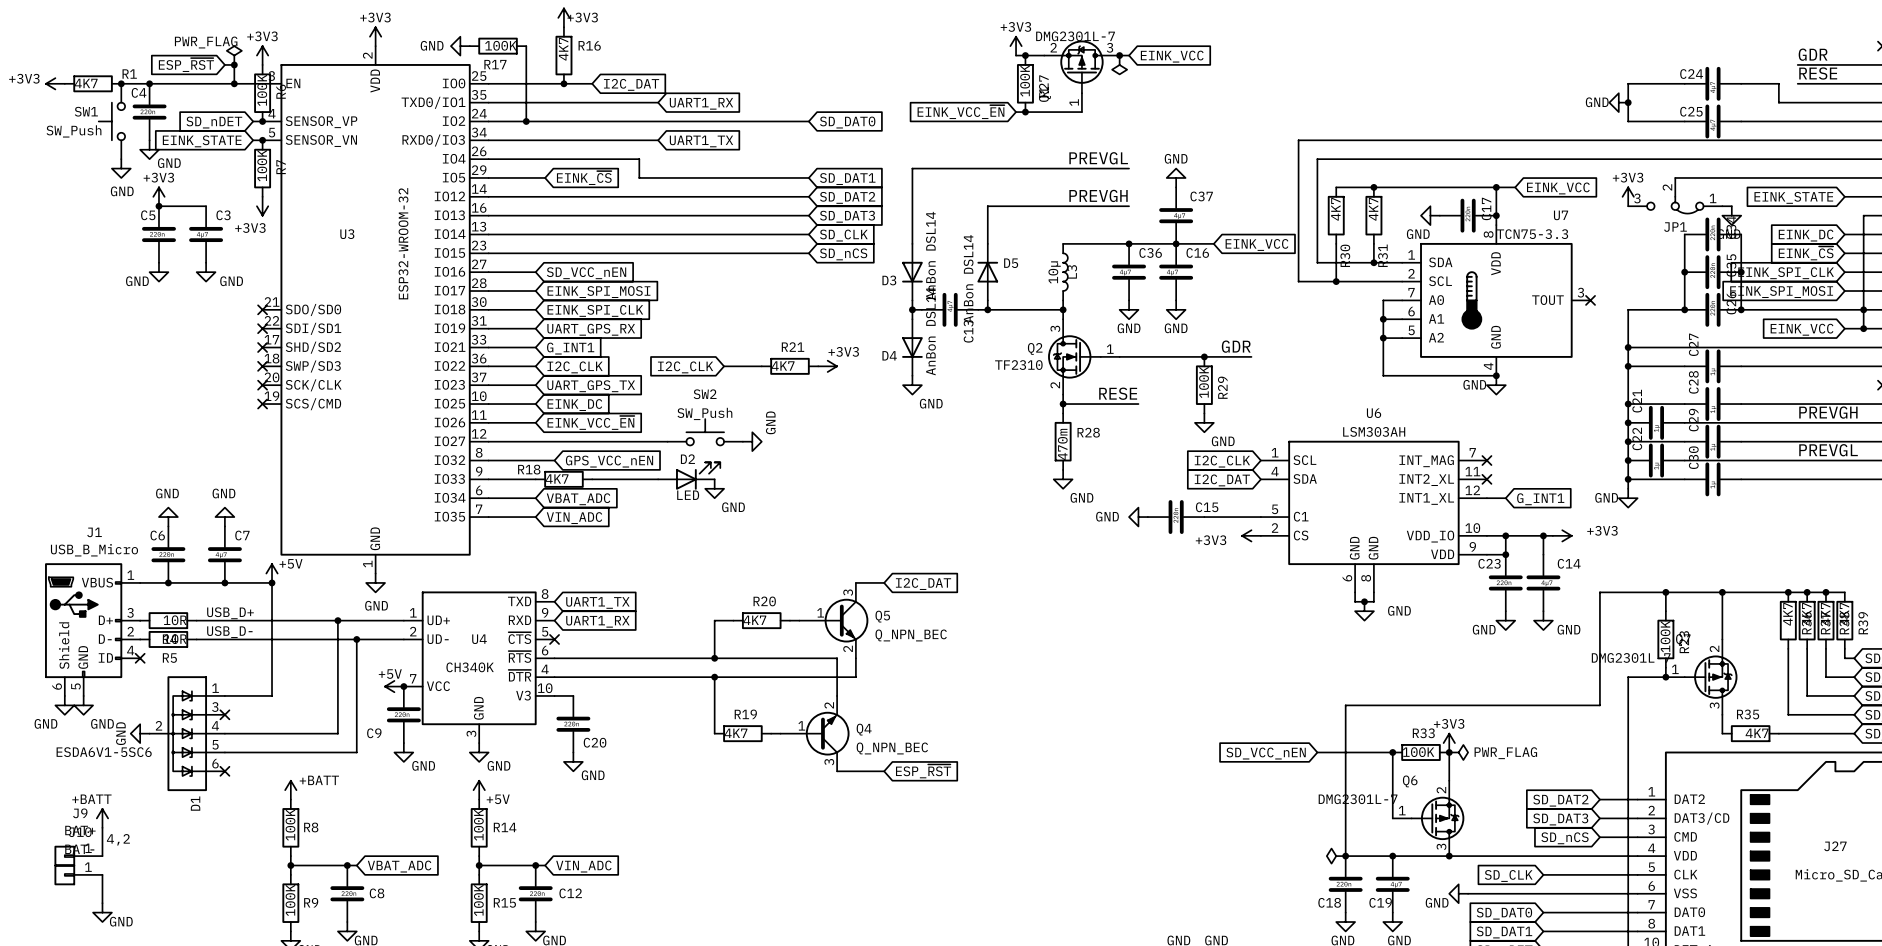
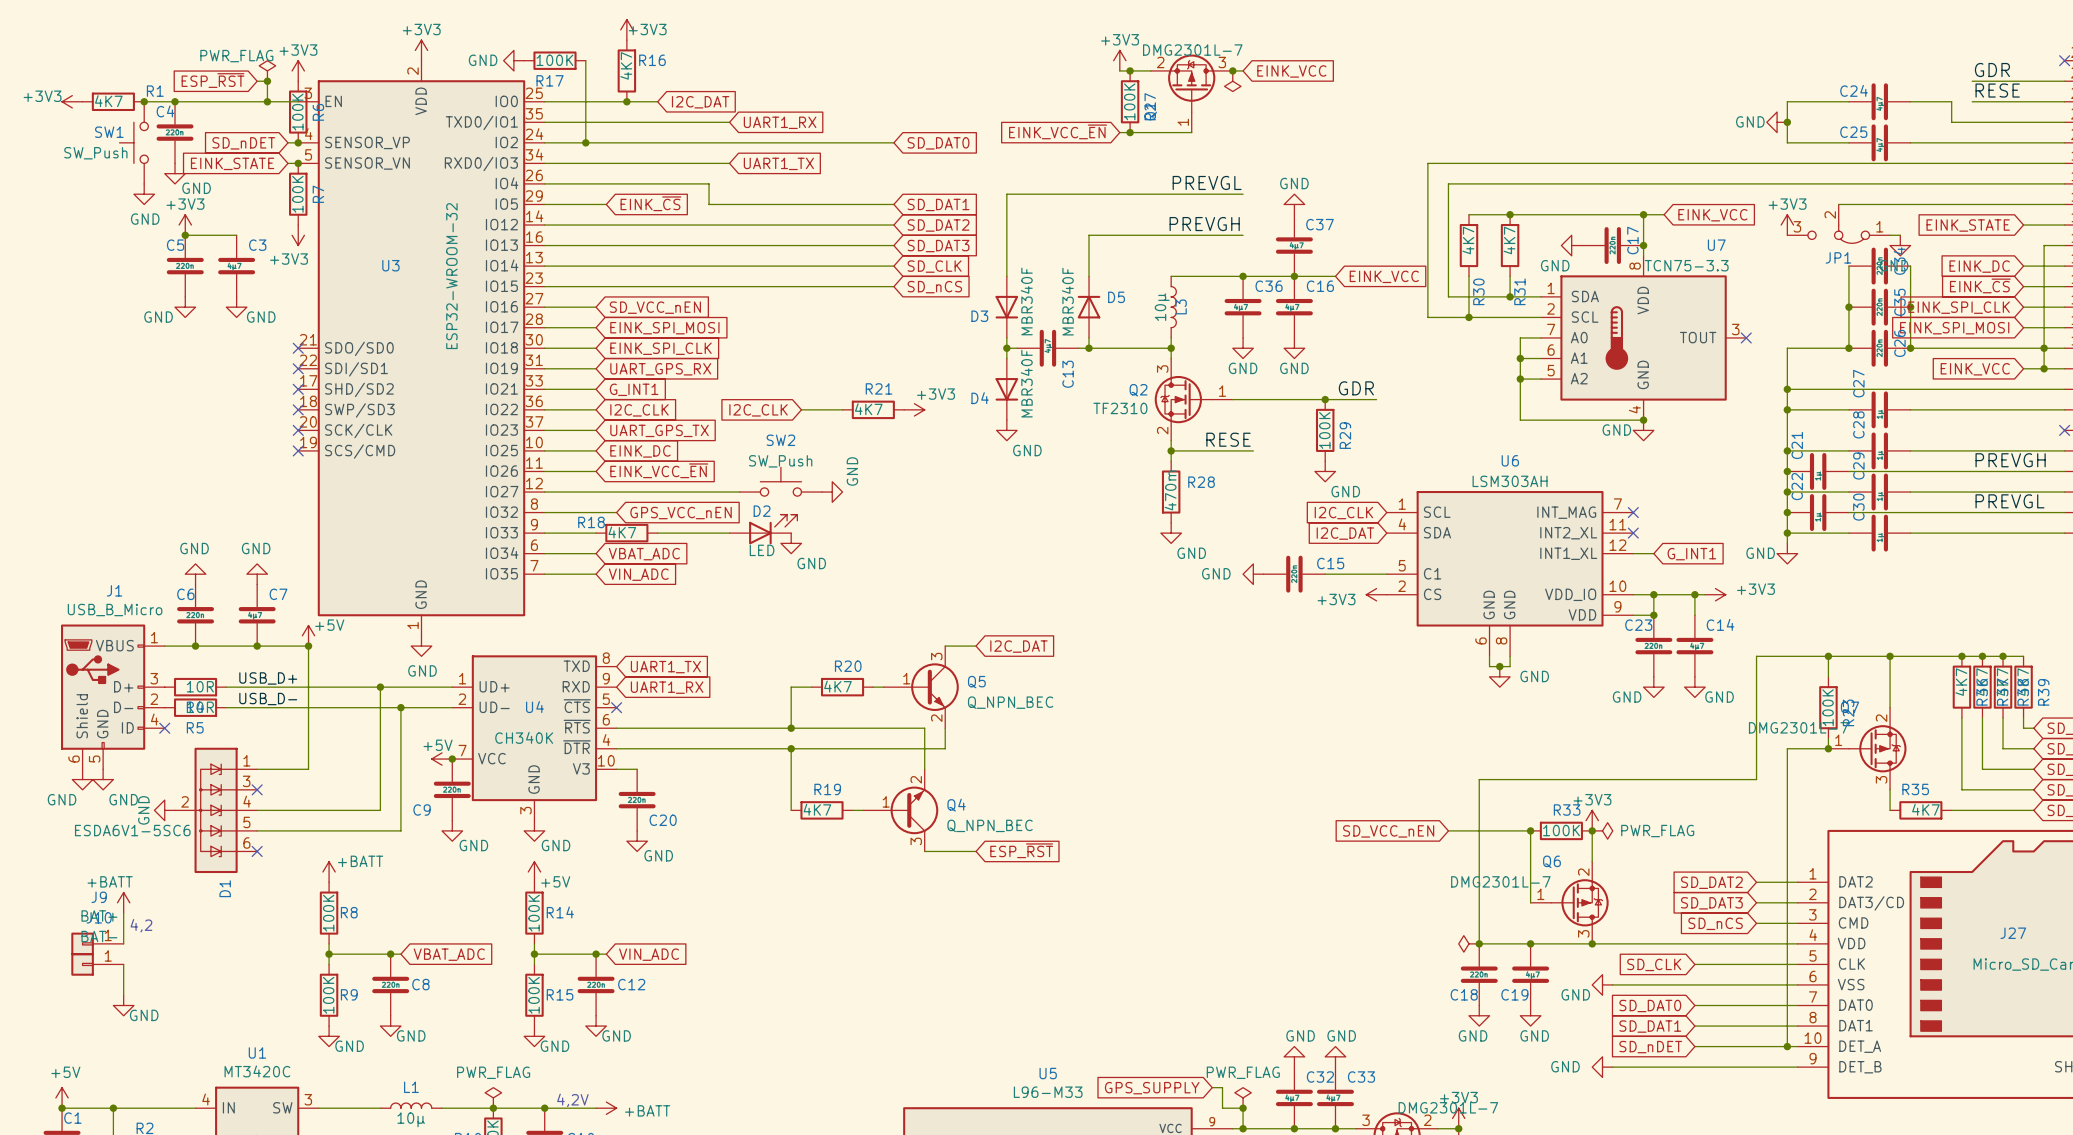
D3 value: AnBon DSL14 (930, 255) -> MBR340F (1026, 301)
D5 value: AnBon DSL14 (968, 279) -> MBR340F (1067, 301)
D4 value: AnBon DSL14 (930, 331) -> MBR340F (1026, 383)

